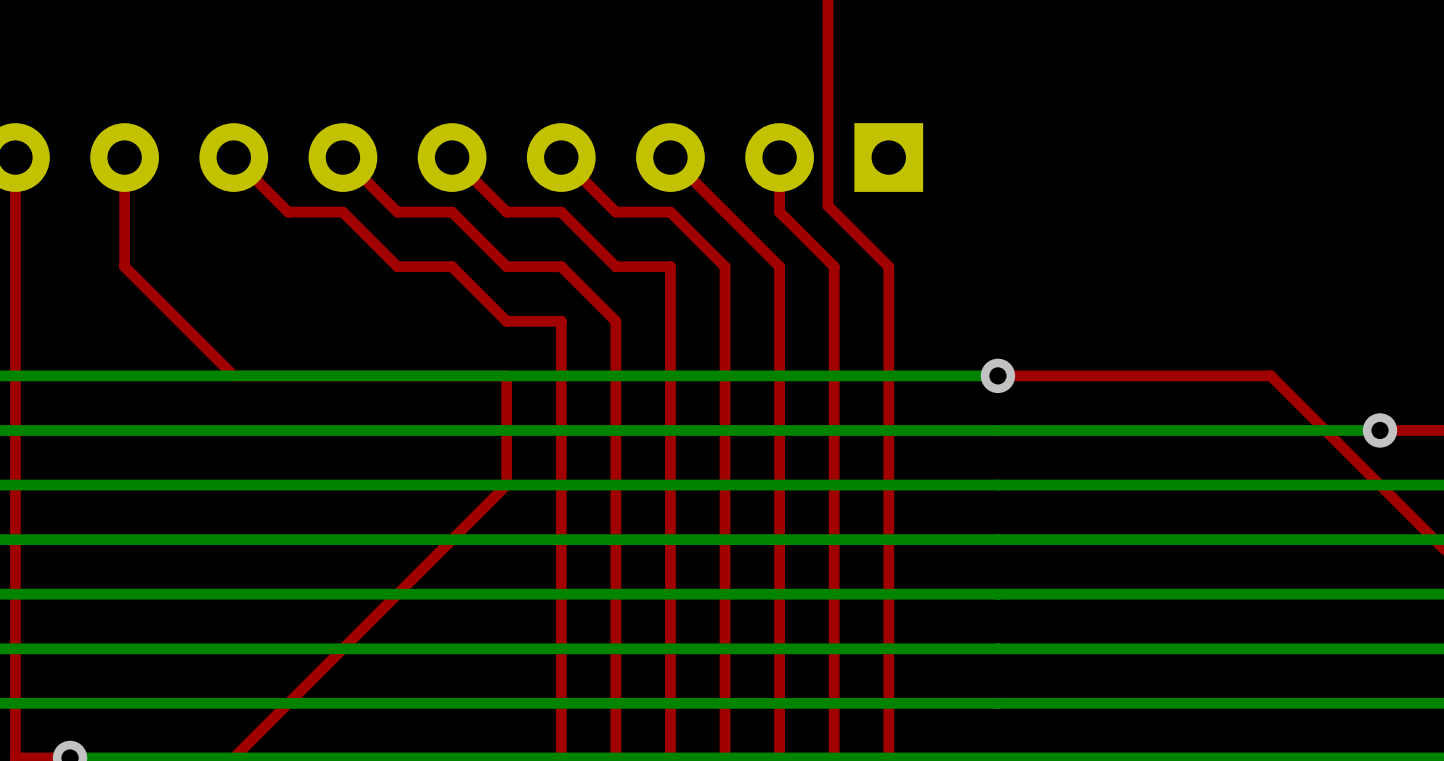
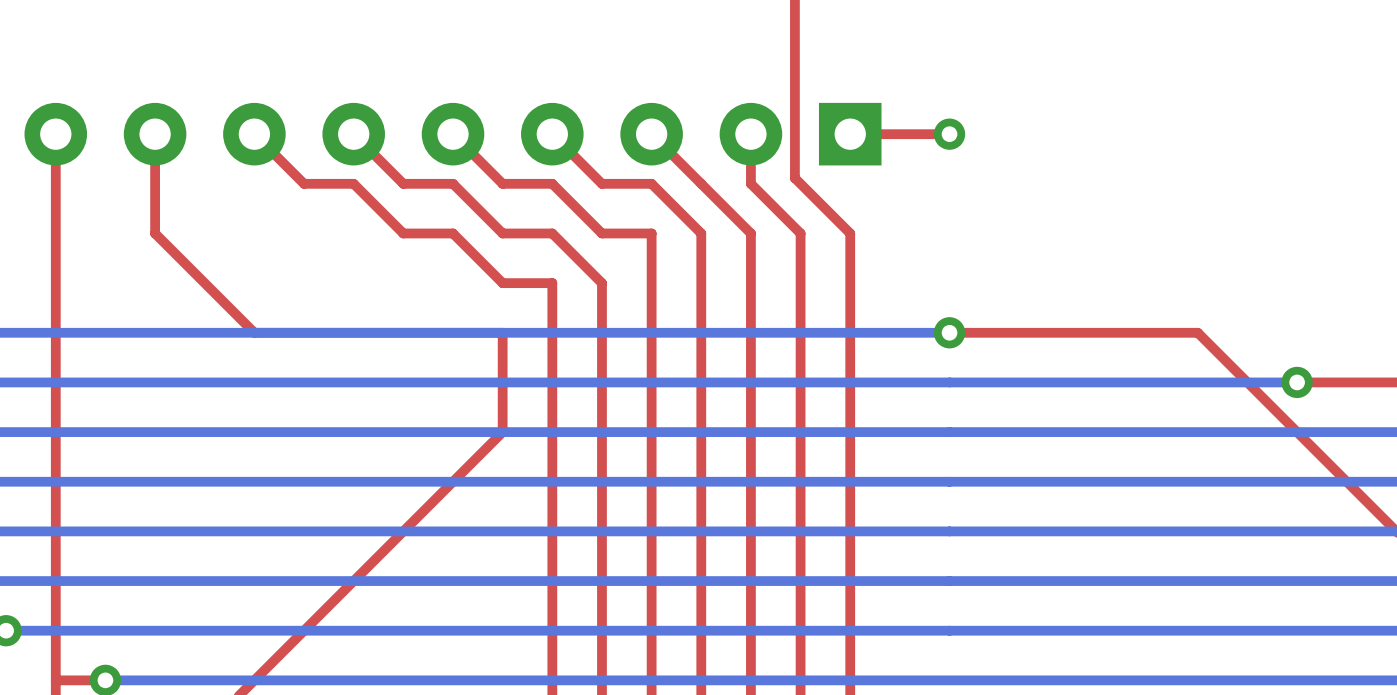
top track: none -> (949, 134) (850, 134)
via: none -> (949, 134)

